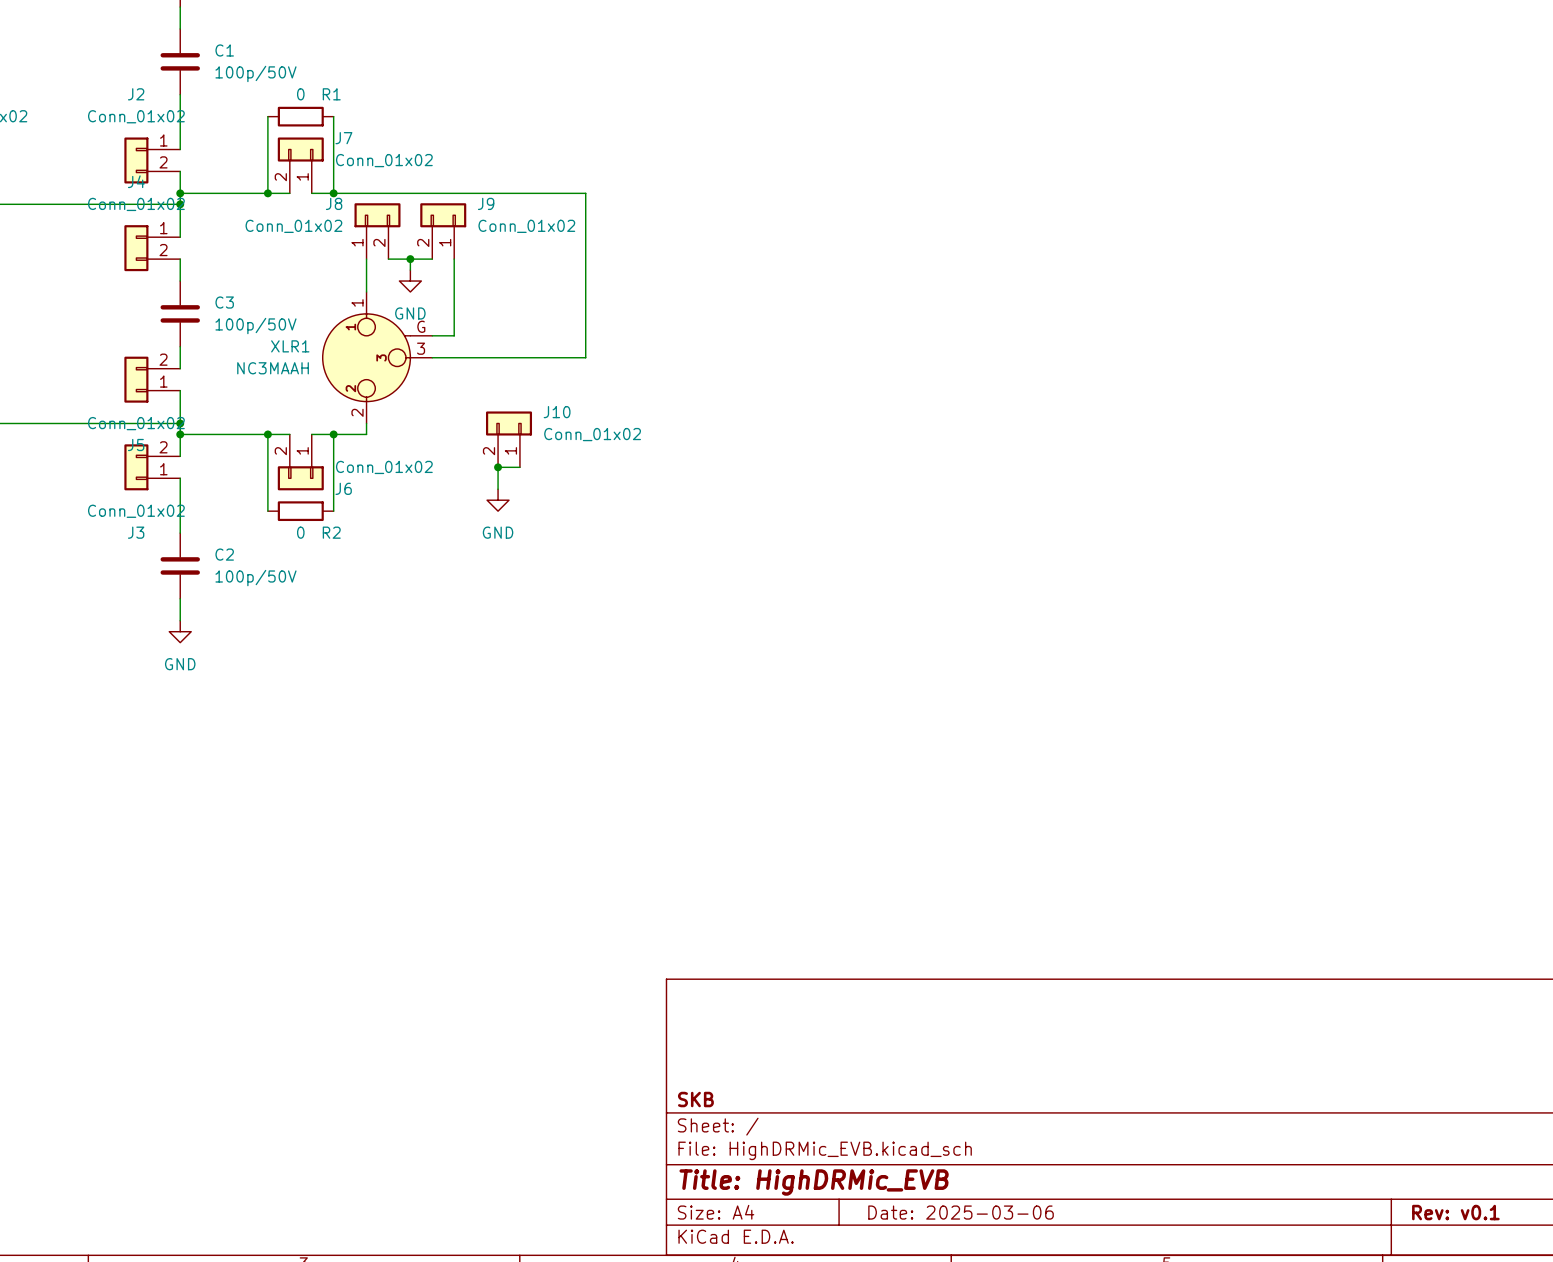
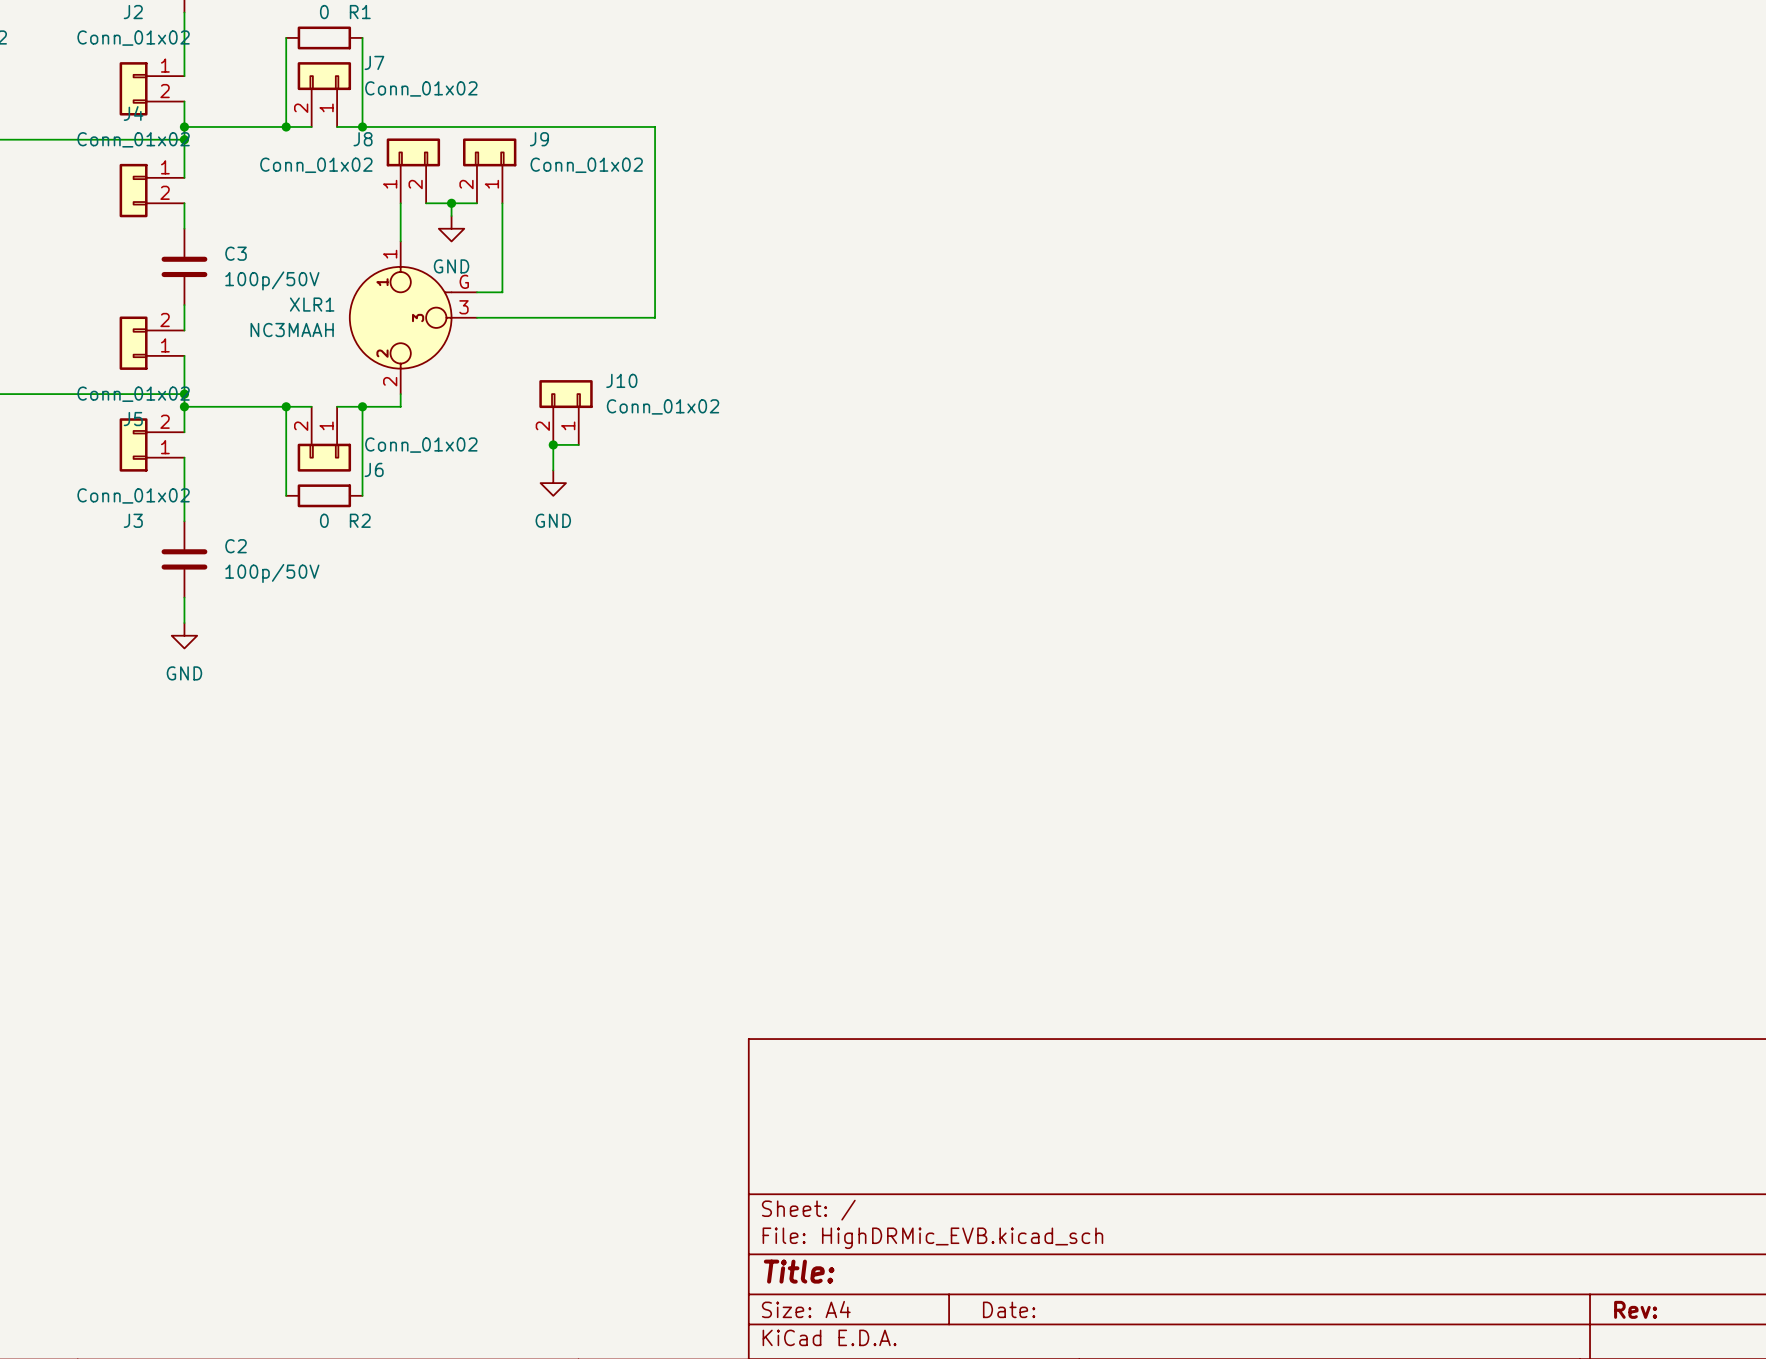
title block: SKB (695, 1099) -> none
title block: Title: HighDRMic_EVB (814, 1182) -> Title: (799, 1271)
title block: Date: 2025-03-06 (961, 1212) -> Date: (1009, 1309)
title block: Rev: v0.1 (1455, 1212) -> Rev: (1635, 1309)

